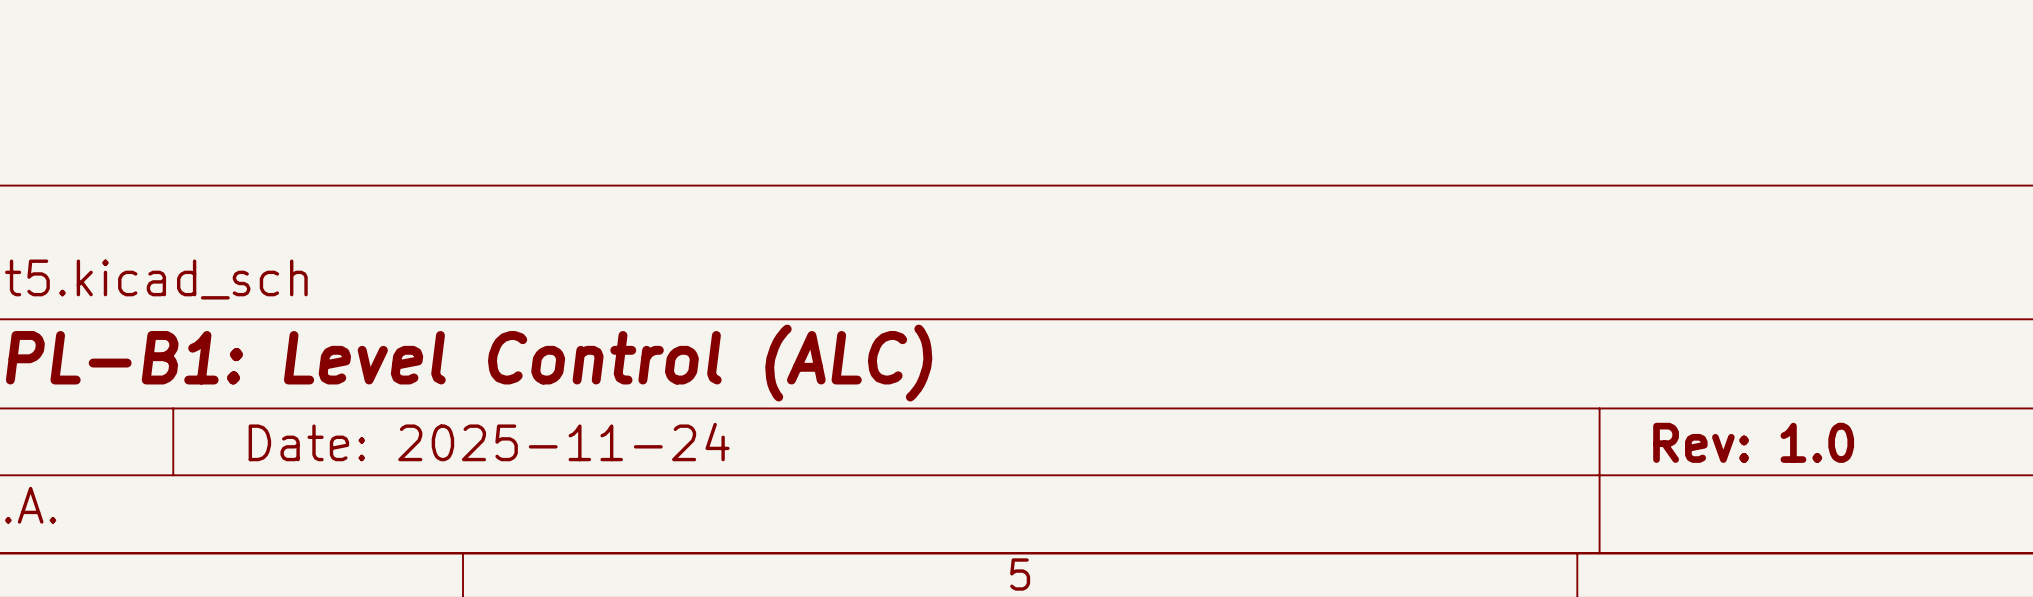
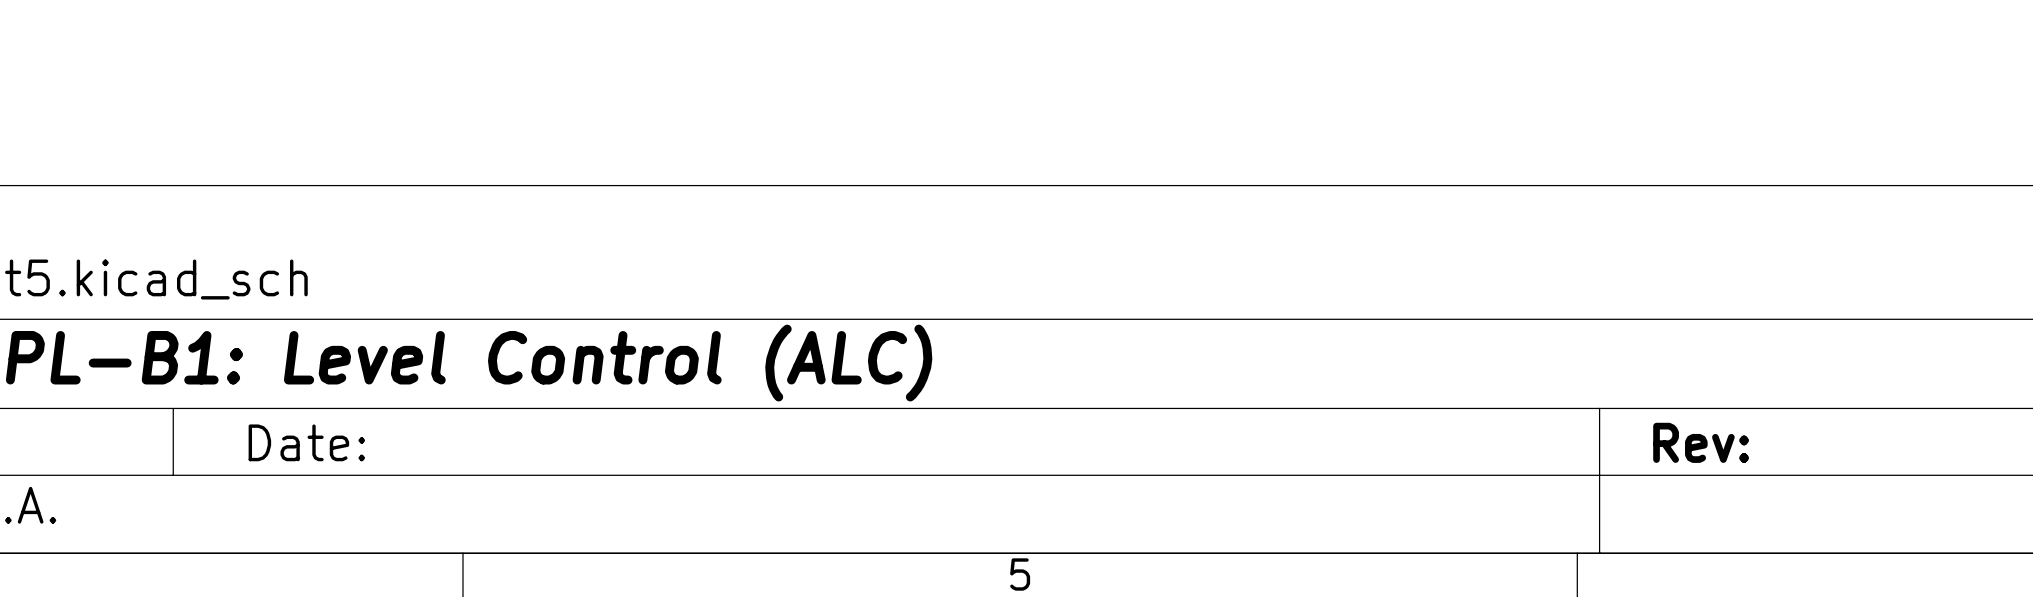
title block: Date: 2025-11-24 (489, 442) -> Date: (306, 442)
title block: Rev: 1.0 (1753, 442) -> Rev: (1701, 442)

